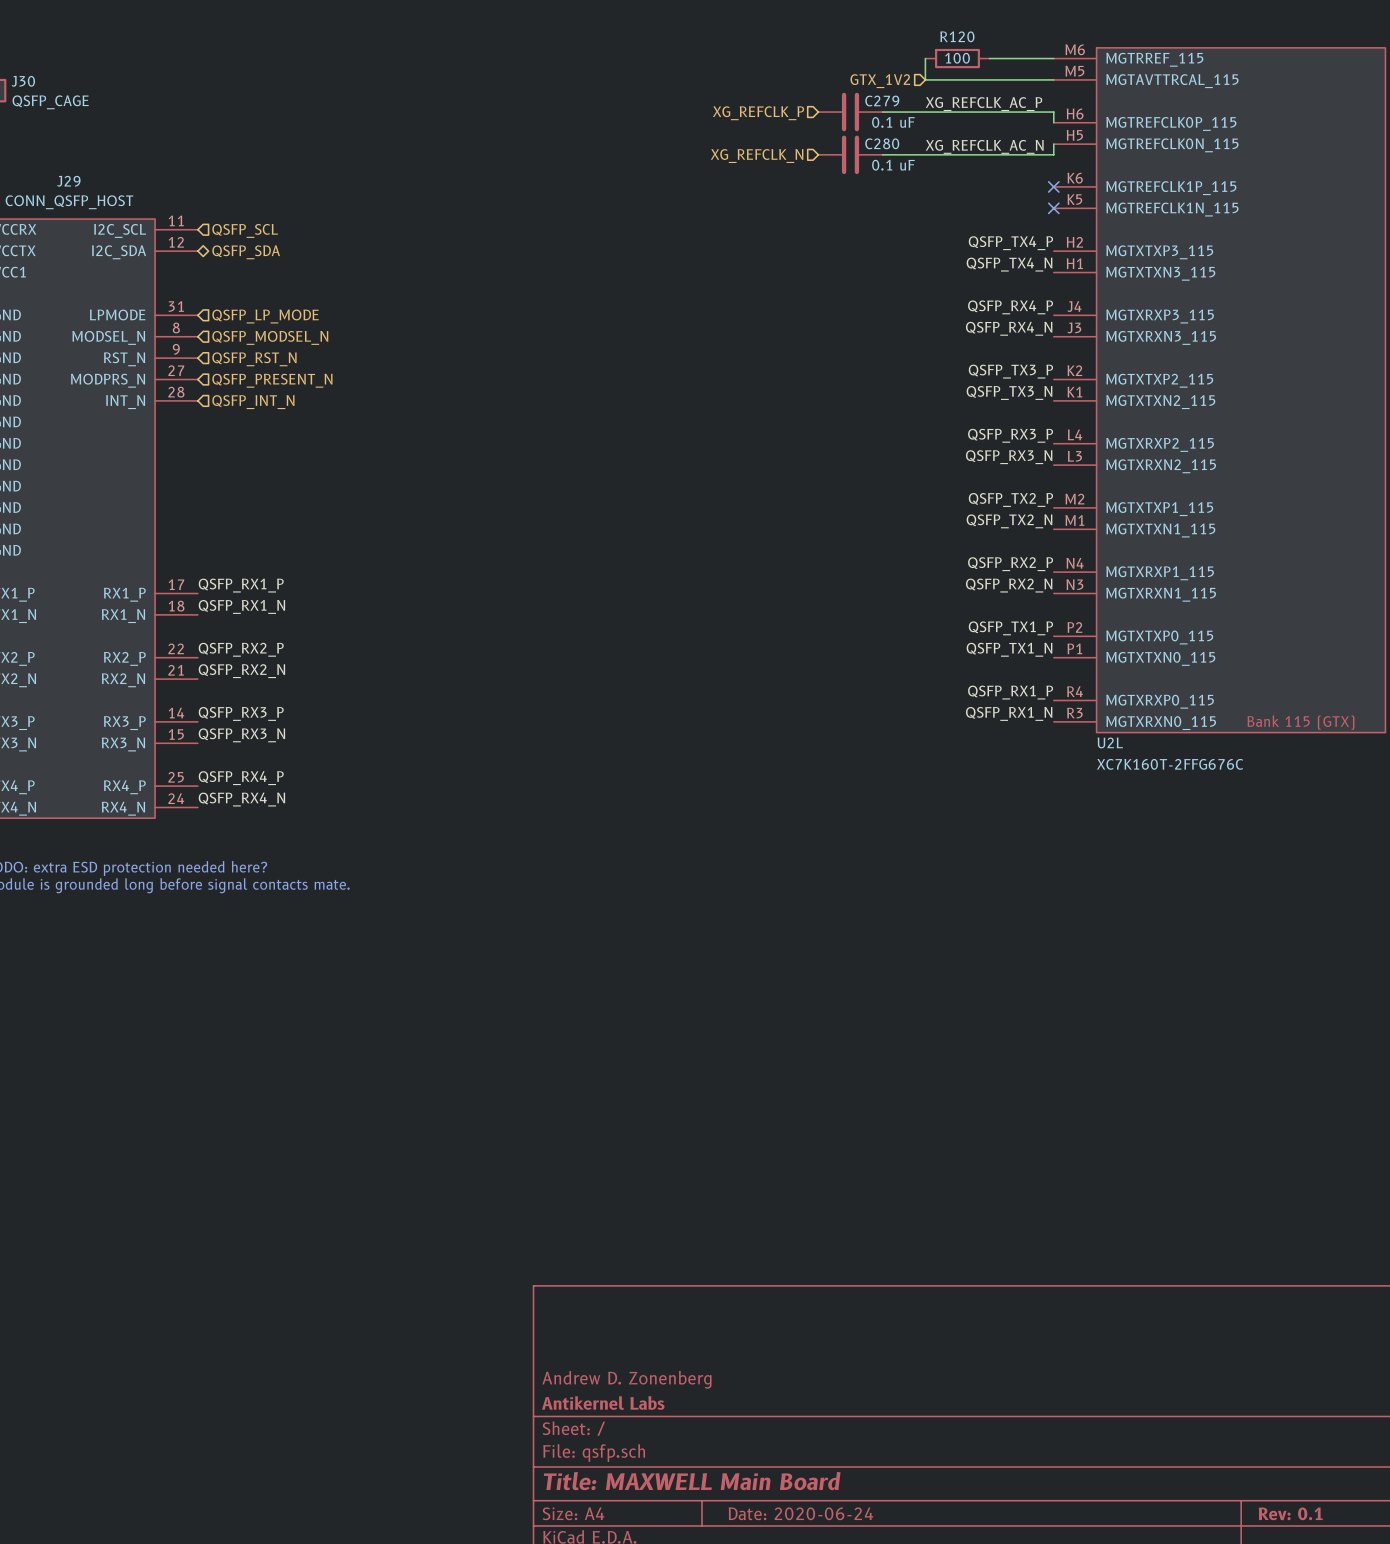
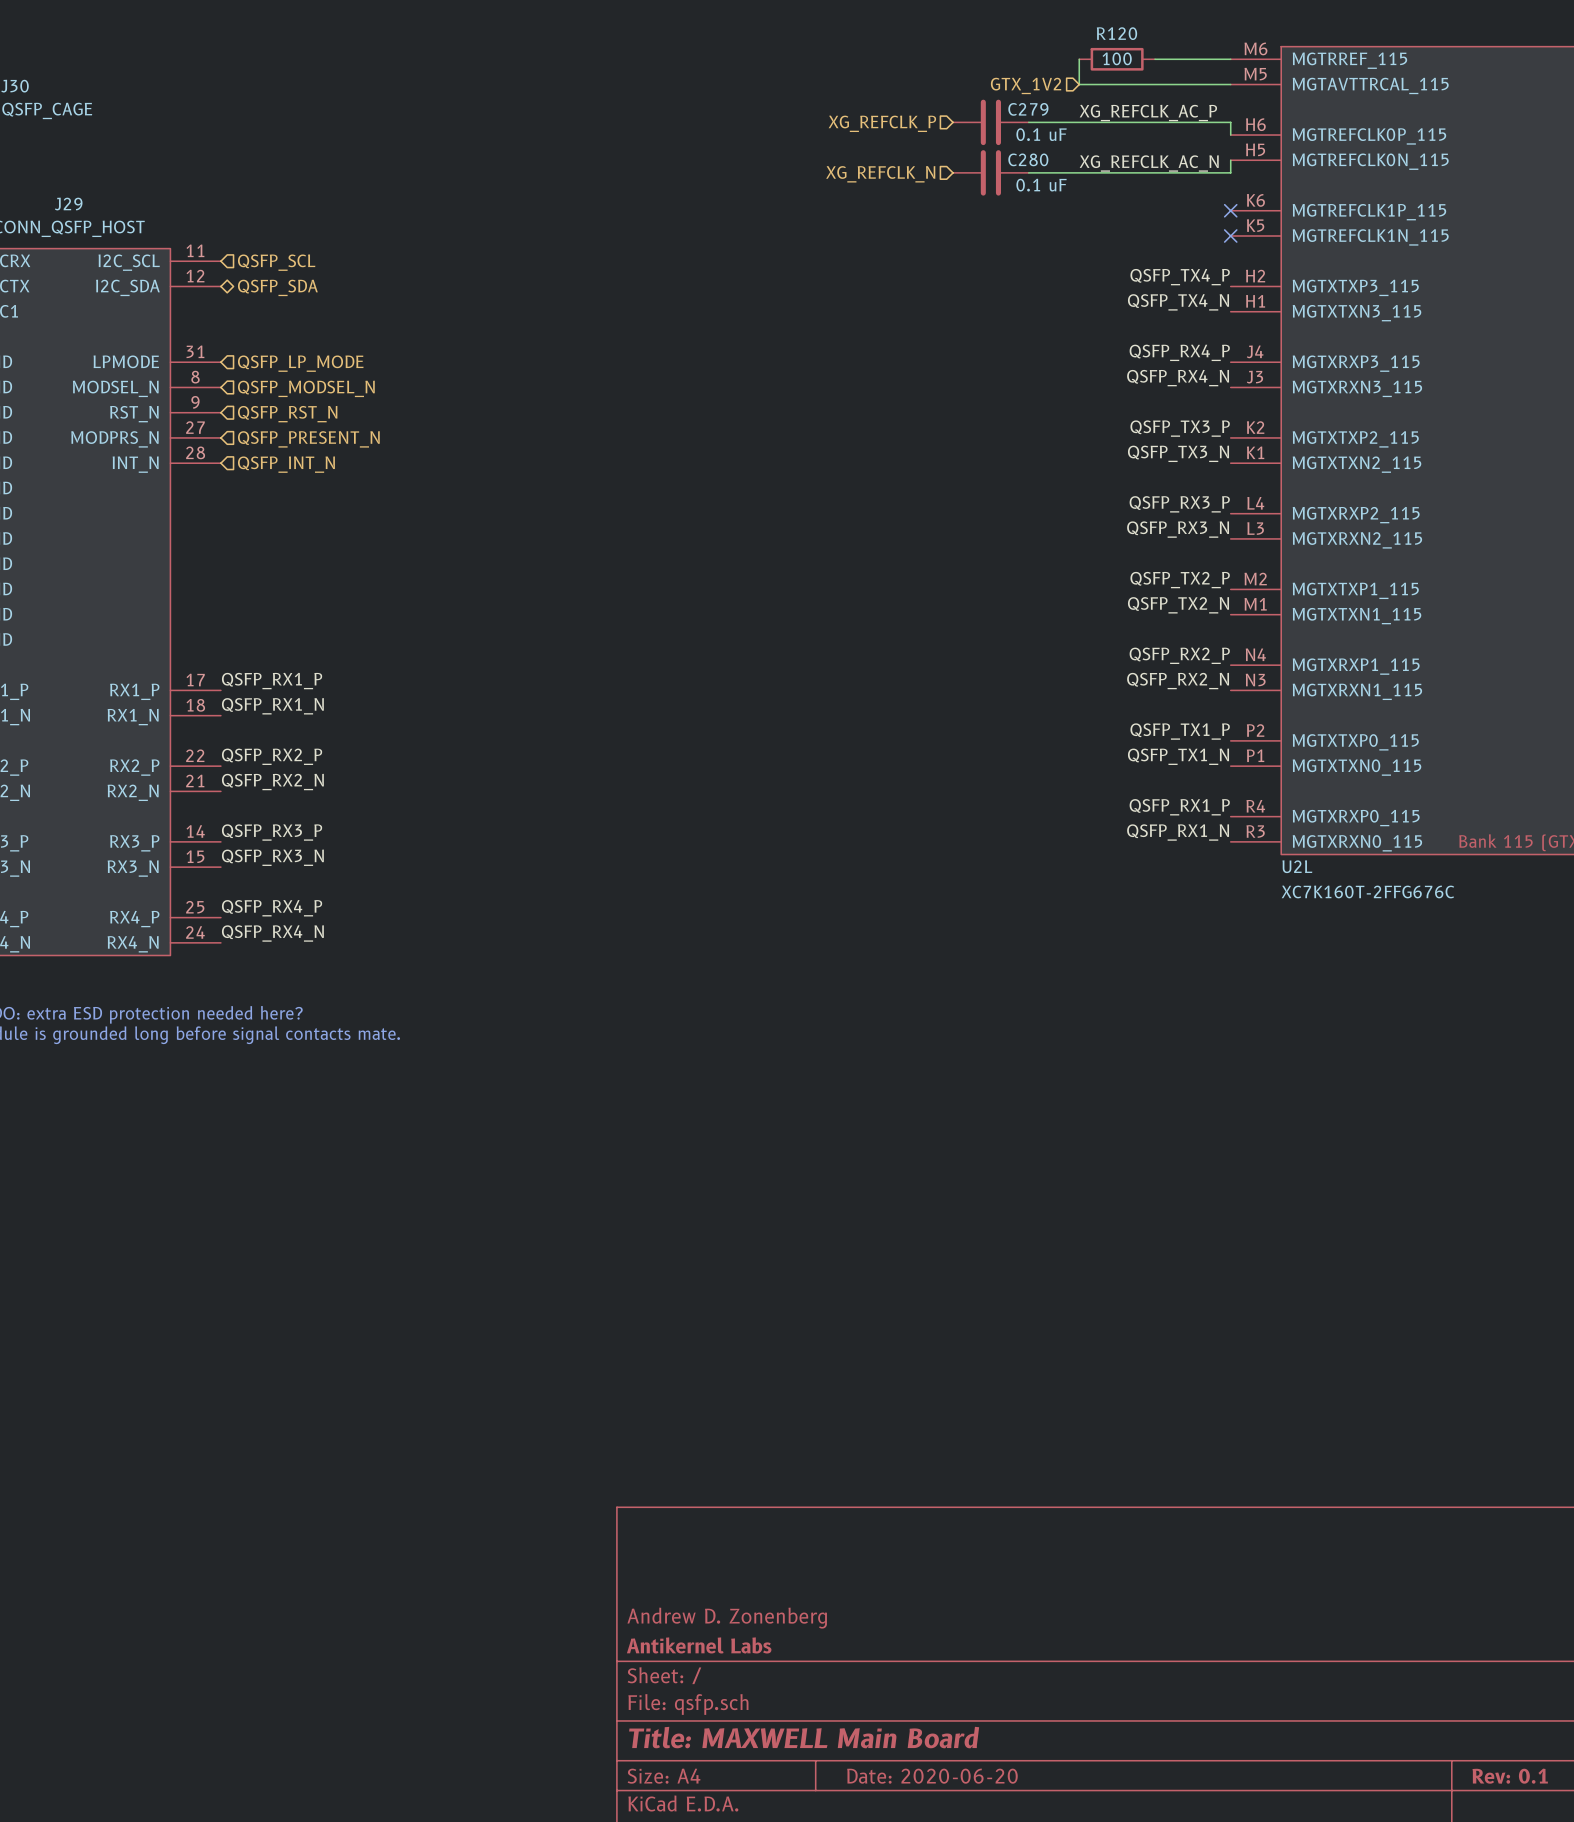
title block: Date: 2020-06-24 (800, 1513) -> Date: 2020-06-20 (932, 1776)

